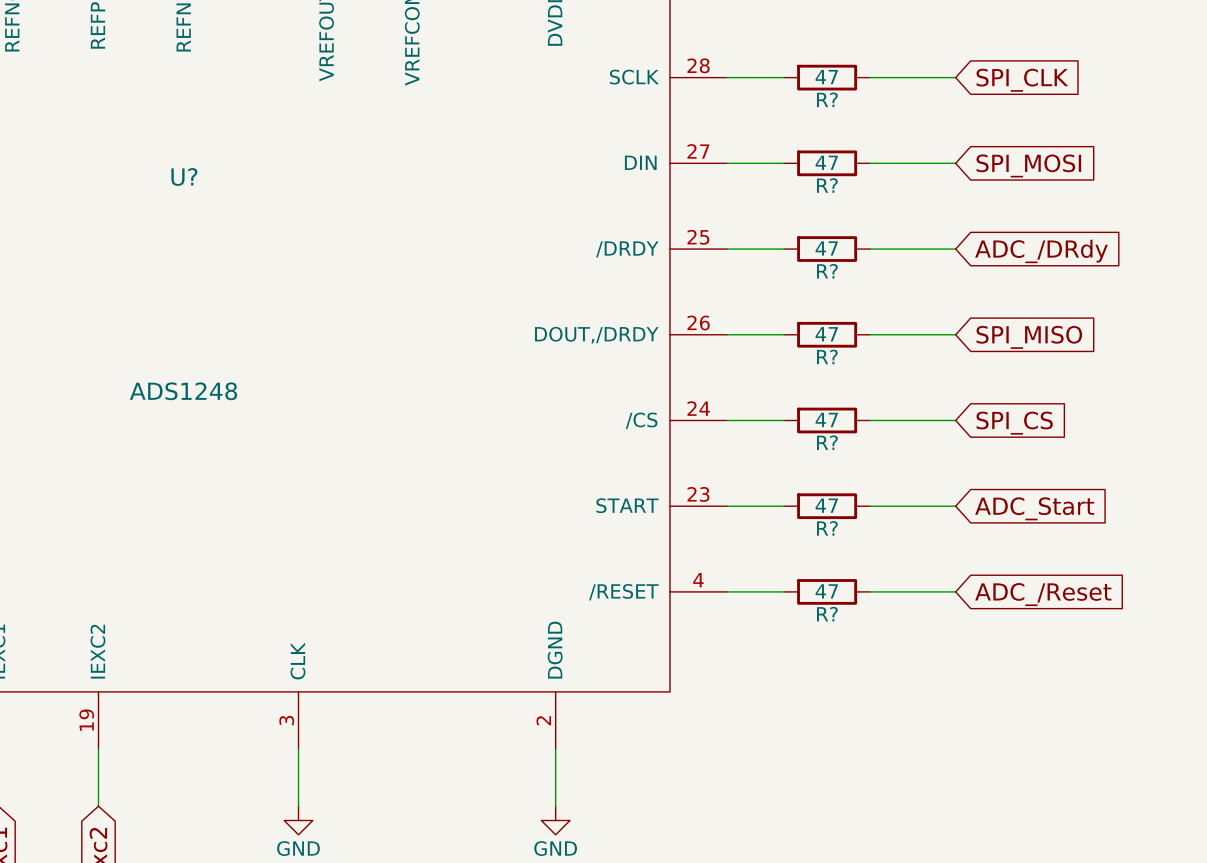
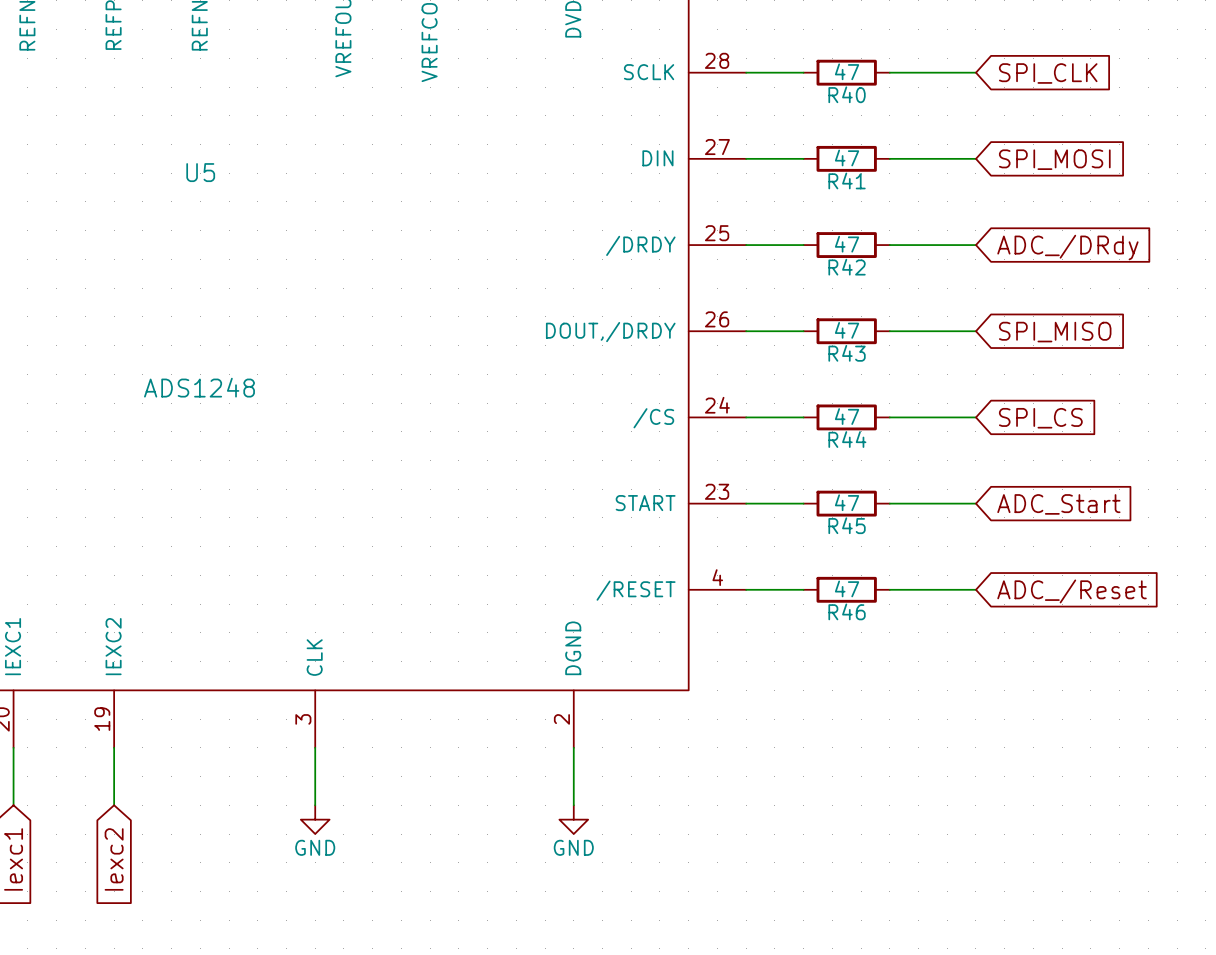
R? name: R? (827, 99) -> R40 (847, 94)
U? name: U? (184, 176) -> U5 (200, 172)
R? name: R? (827, 185) -> R41 (847, 180)
R? name: R? (827, 271) -> R42 (847, 267)
R? name: R? (827, 356) -> R43 (847, 353)
R? name: R? (827, 442) -> R44 (847, 439)
R? name: R? (827, 528) -> R45 (847, 525)
R? name: R? (827, 614) -> R46 (847, 611)

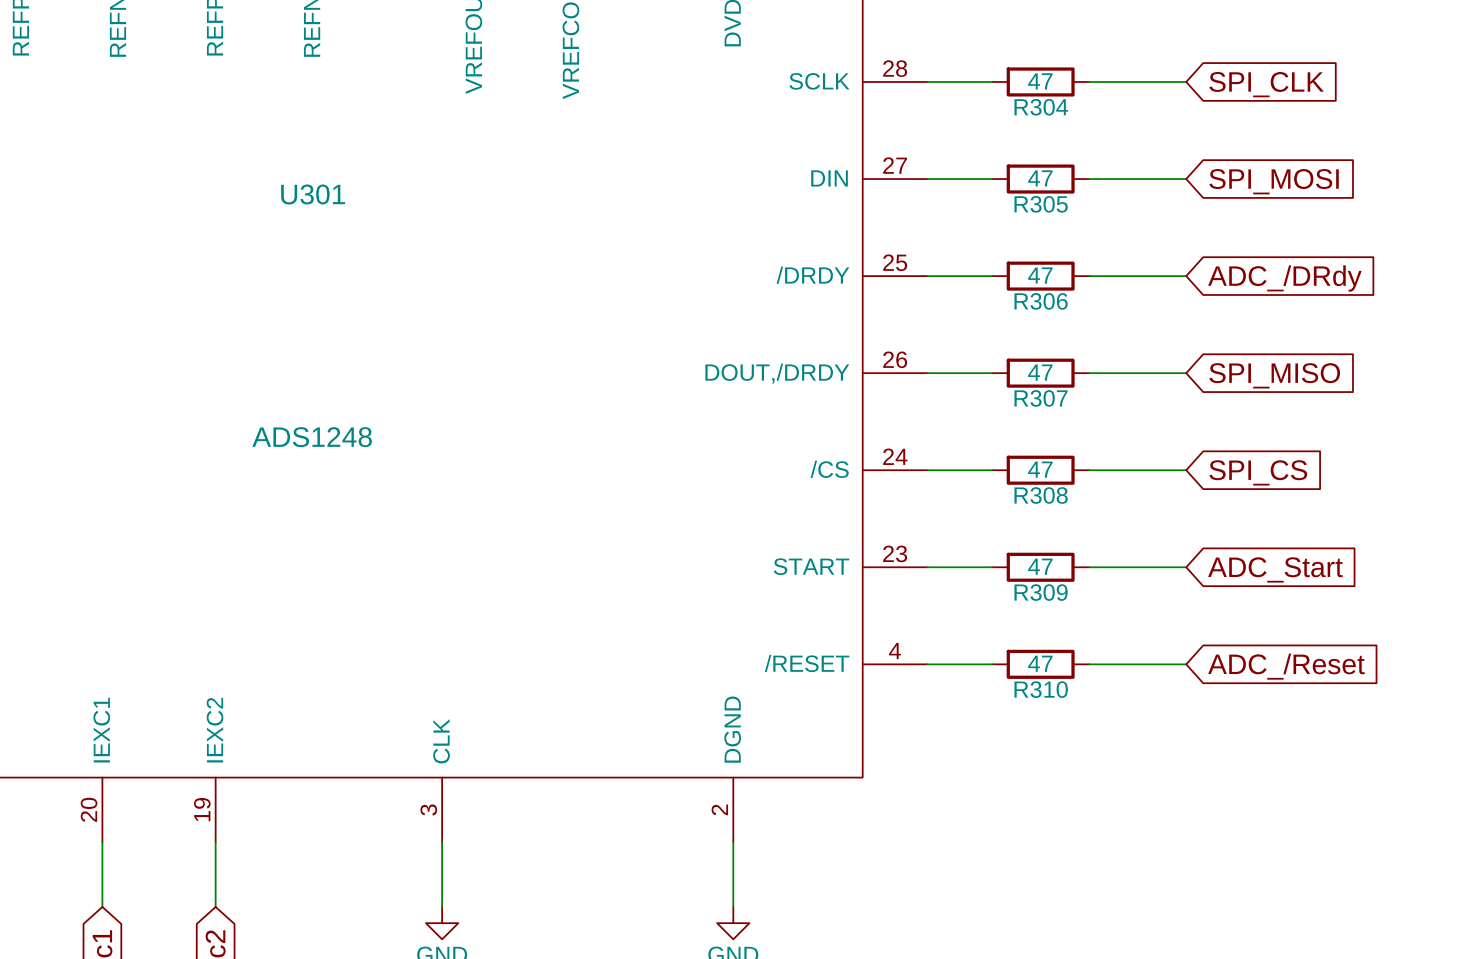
R40 name: R40 (847, 94) -> R304 (1041, 107)
U5 name: U5 (200, 172) -> U301 (313, 194)
R41 name: R41 (847, 180) -> R305 (1041, 204)
R42 name: R42 (847, 267) -> R306 (1041, 301)
R43 name: R43 (847, 353) -> R307 (1041, 398)
R44 name: R44 (847, 439) -> R308 (1041, 495)
R45 name: R45 (847, 525) -> R309 (1041, 592)
R46 name: R46 (847, 611) -> R310 (1041, 689)

